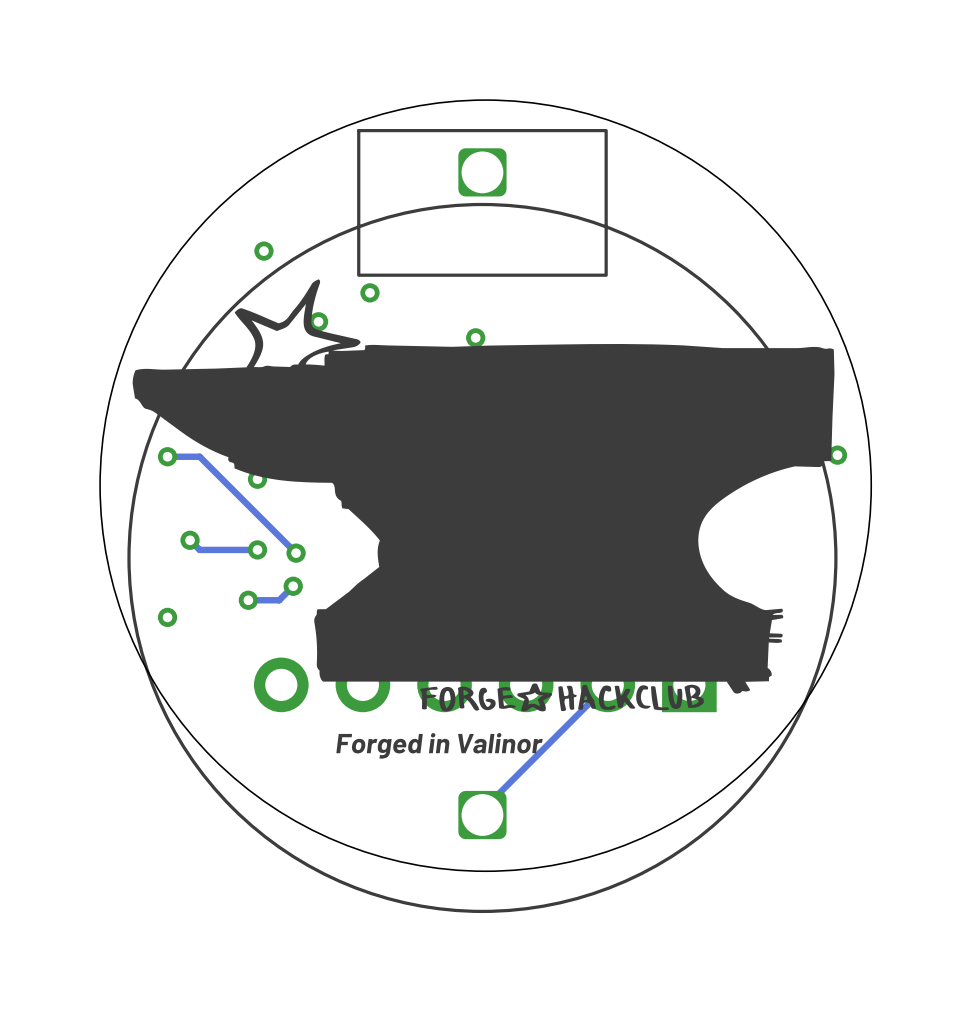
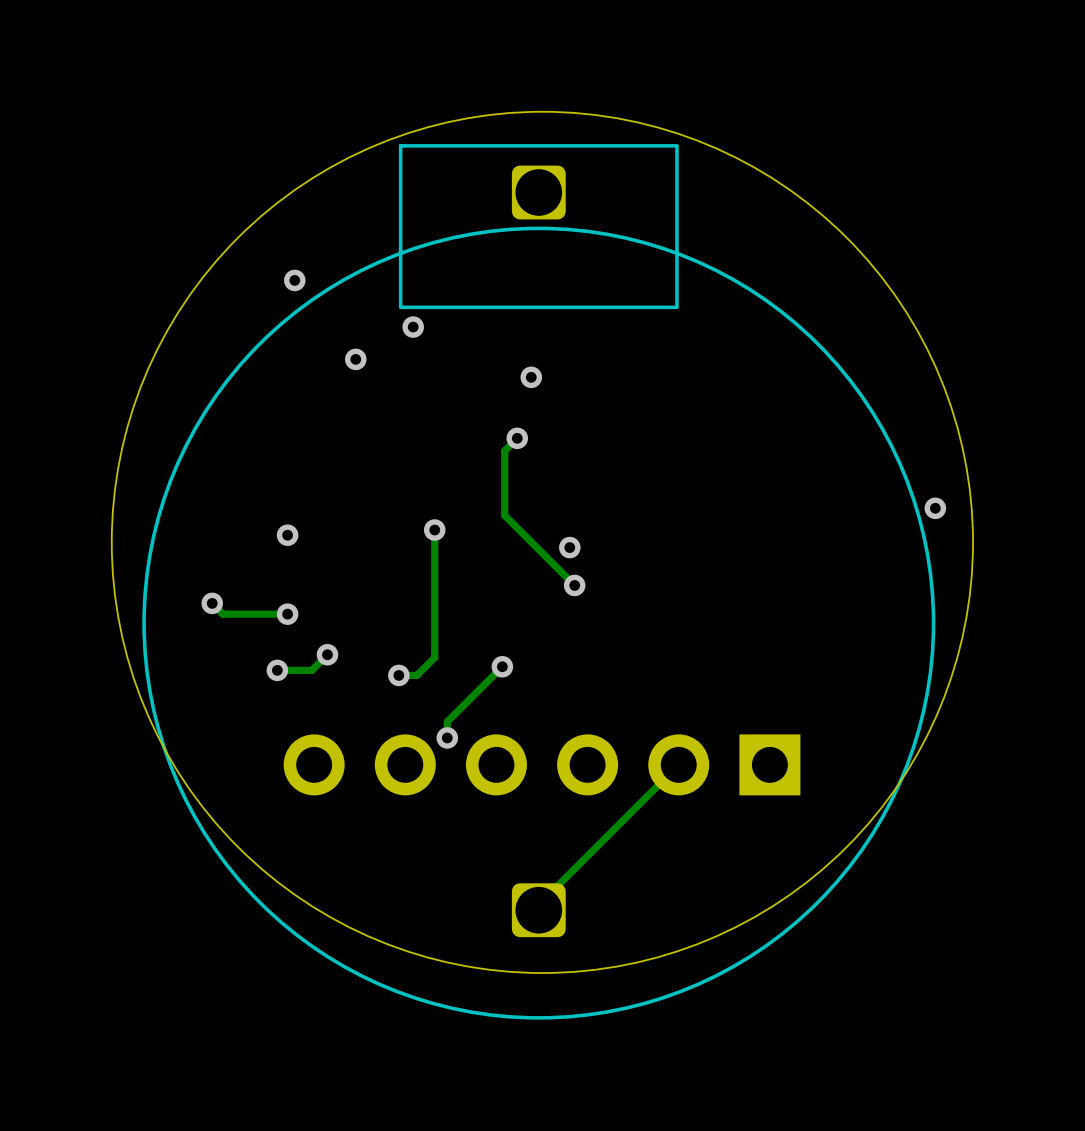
drawing: [132, 279, 835, 712] -> none
track: (167, 456) (199, 456) (296, 553) -> none
via: (167, 456) -> none
via: (296, 553) -> none
via: (167, 617) -> none
text: Forged in Valinor (439, 745) -> none

